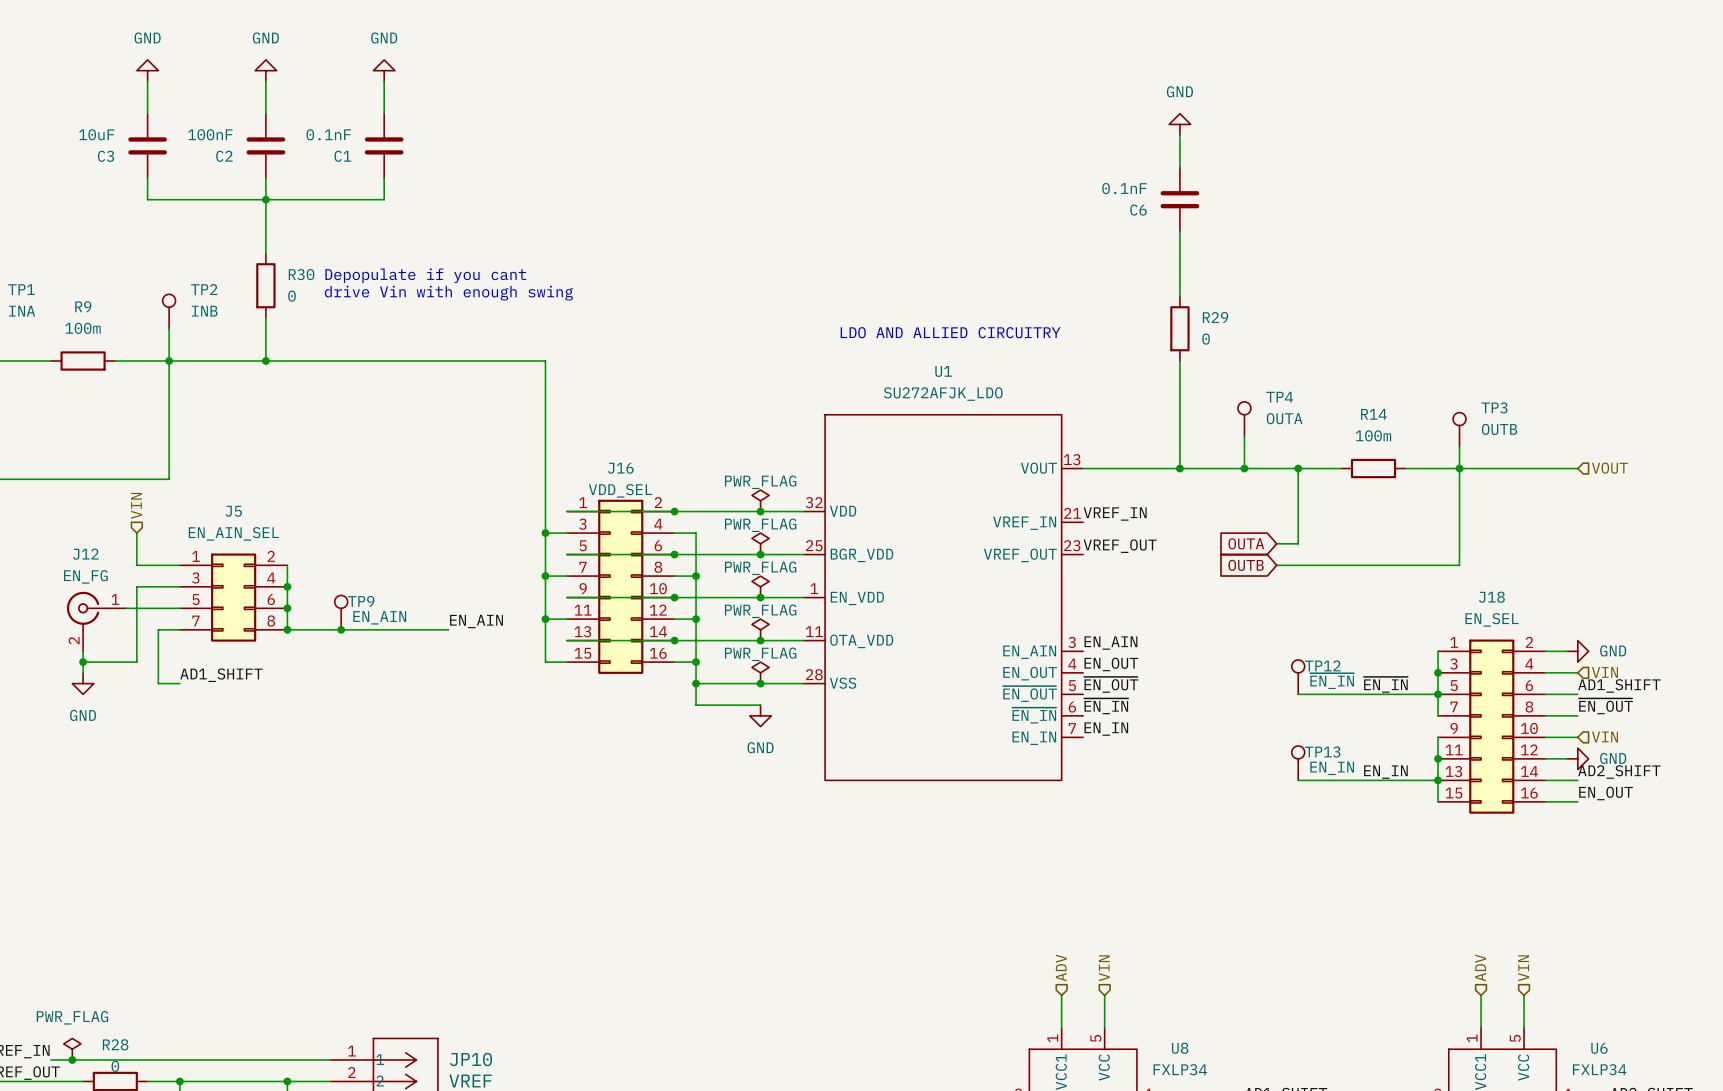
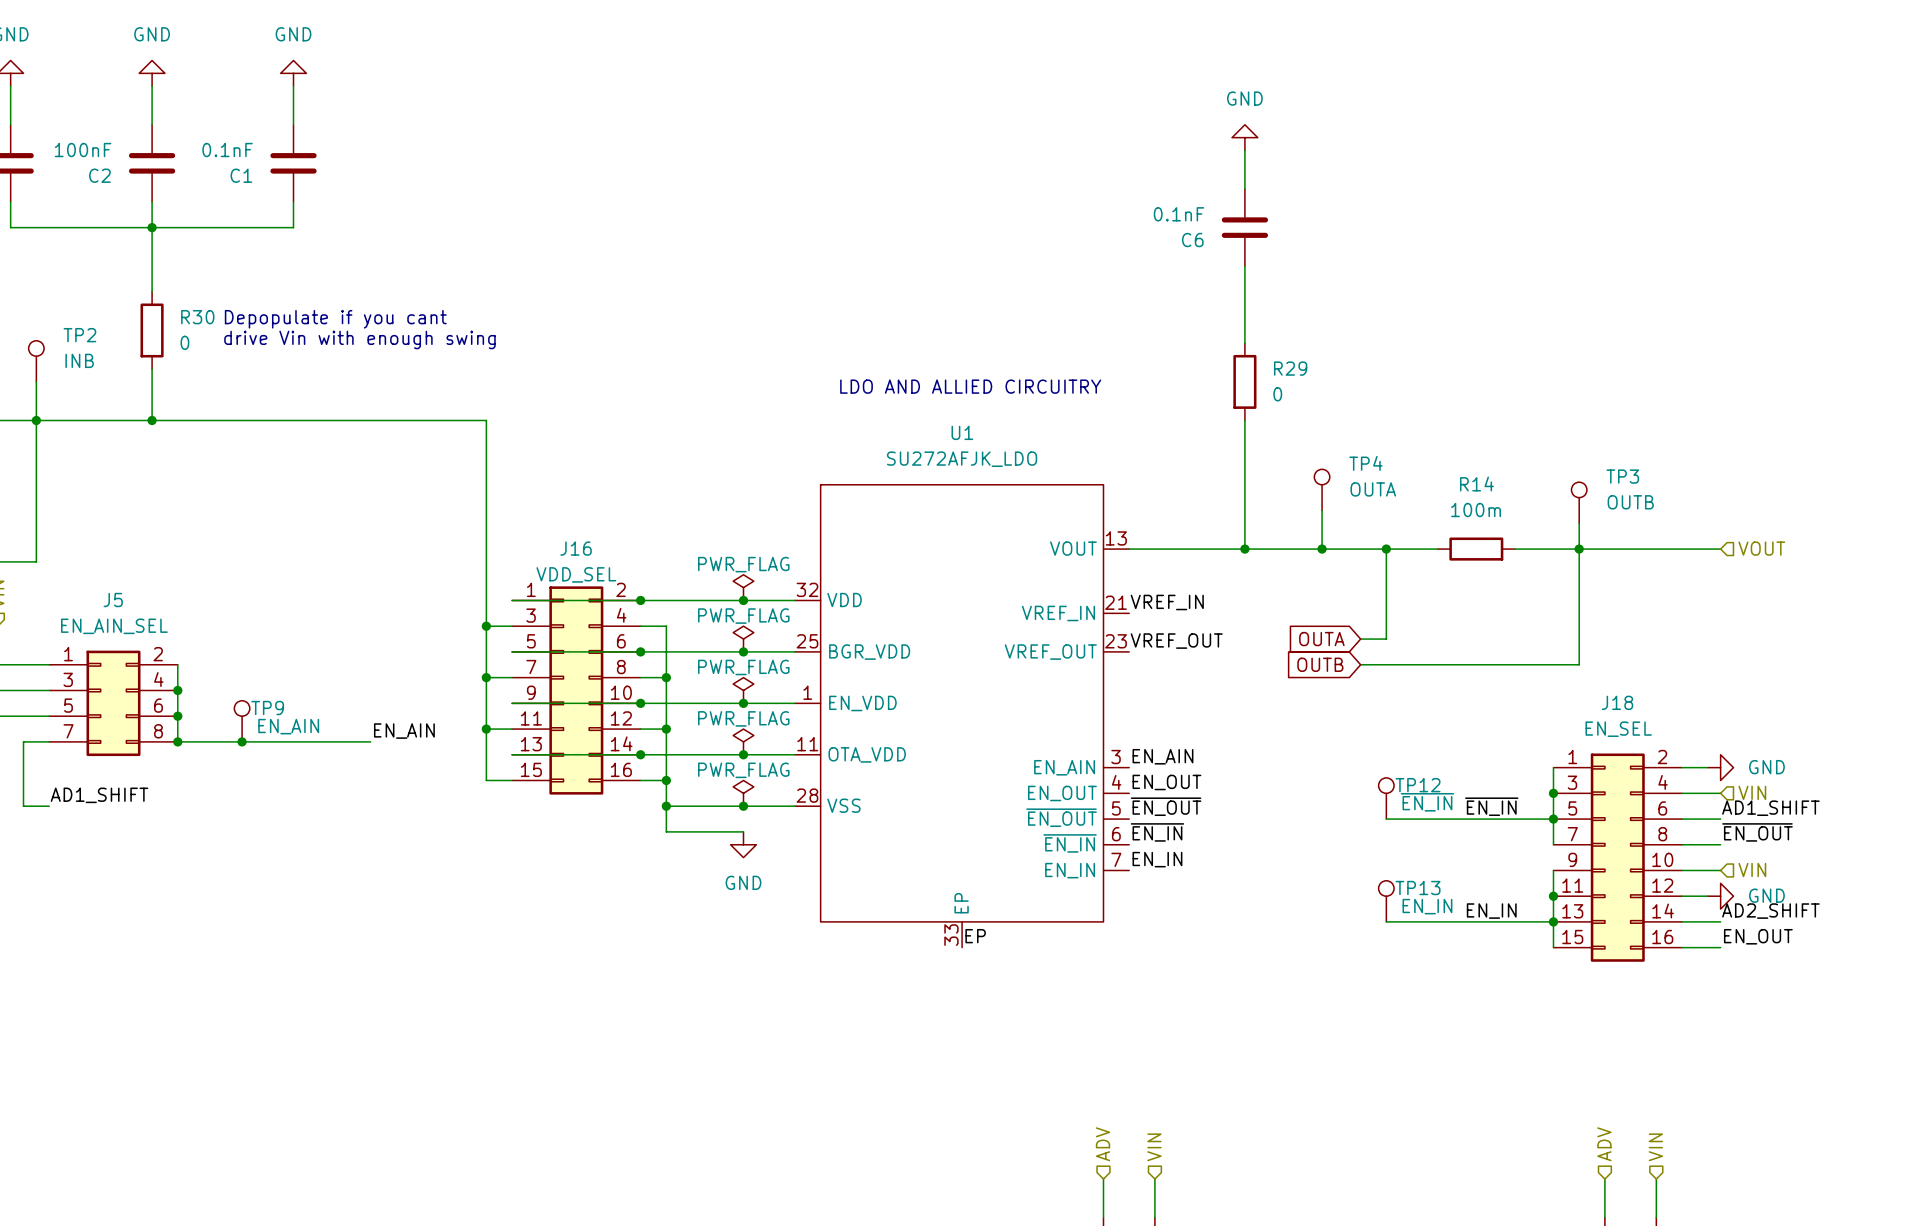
U1 symbol: [803, 414, 1084, 781] -> [794, 484, 1130, 948]
label: none -> EP (975, 936)

